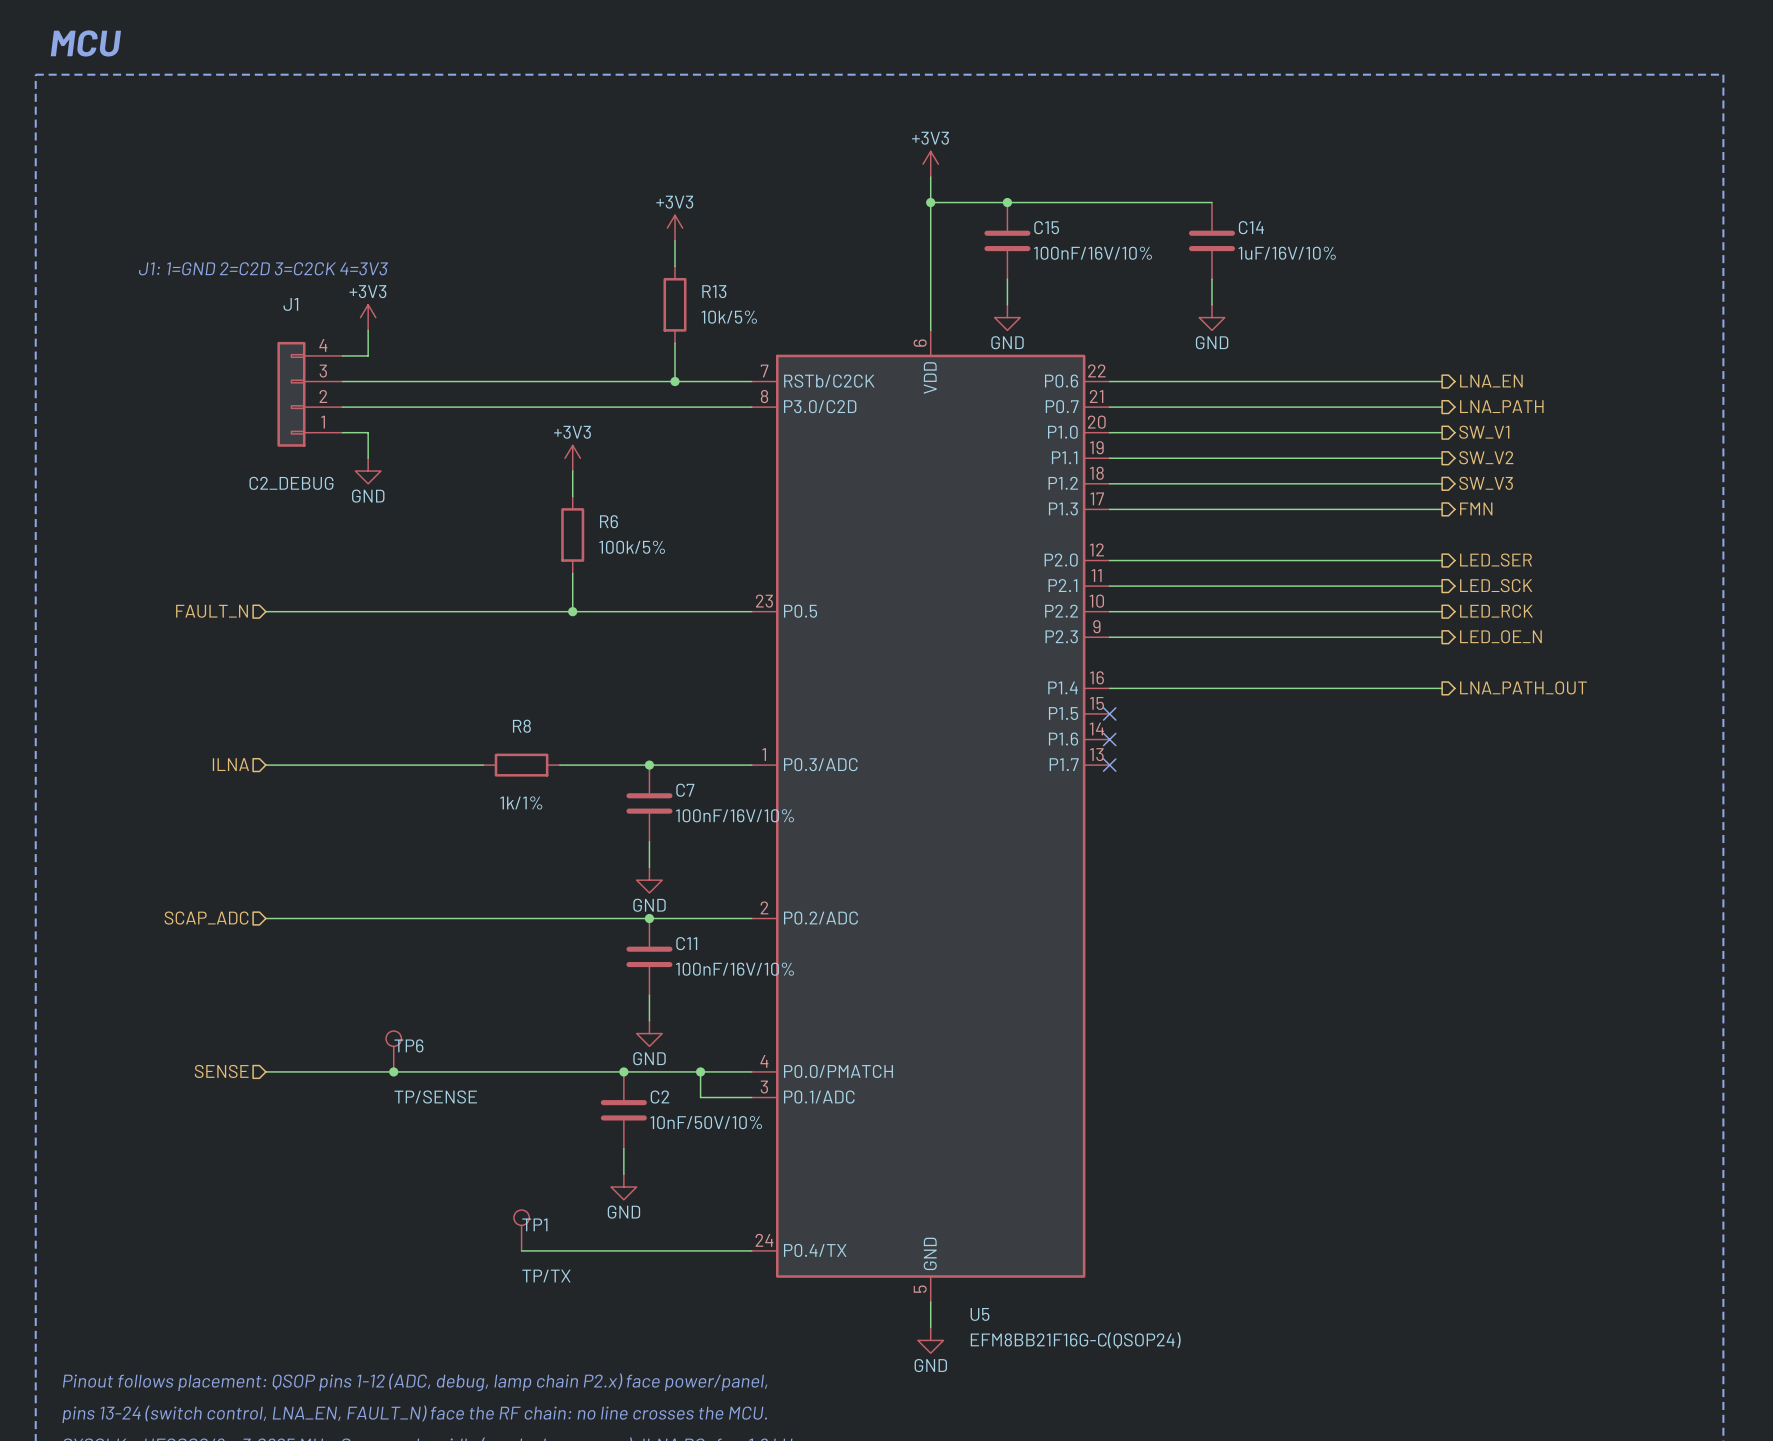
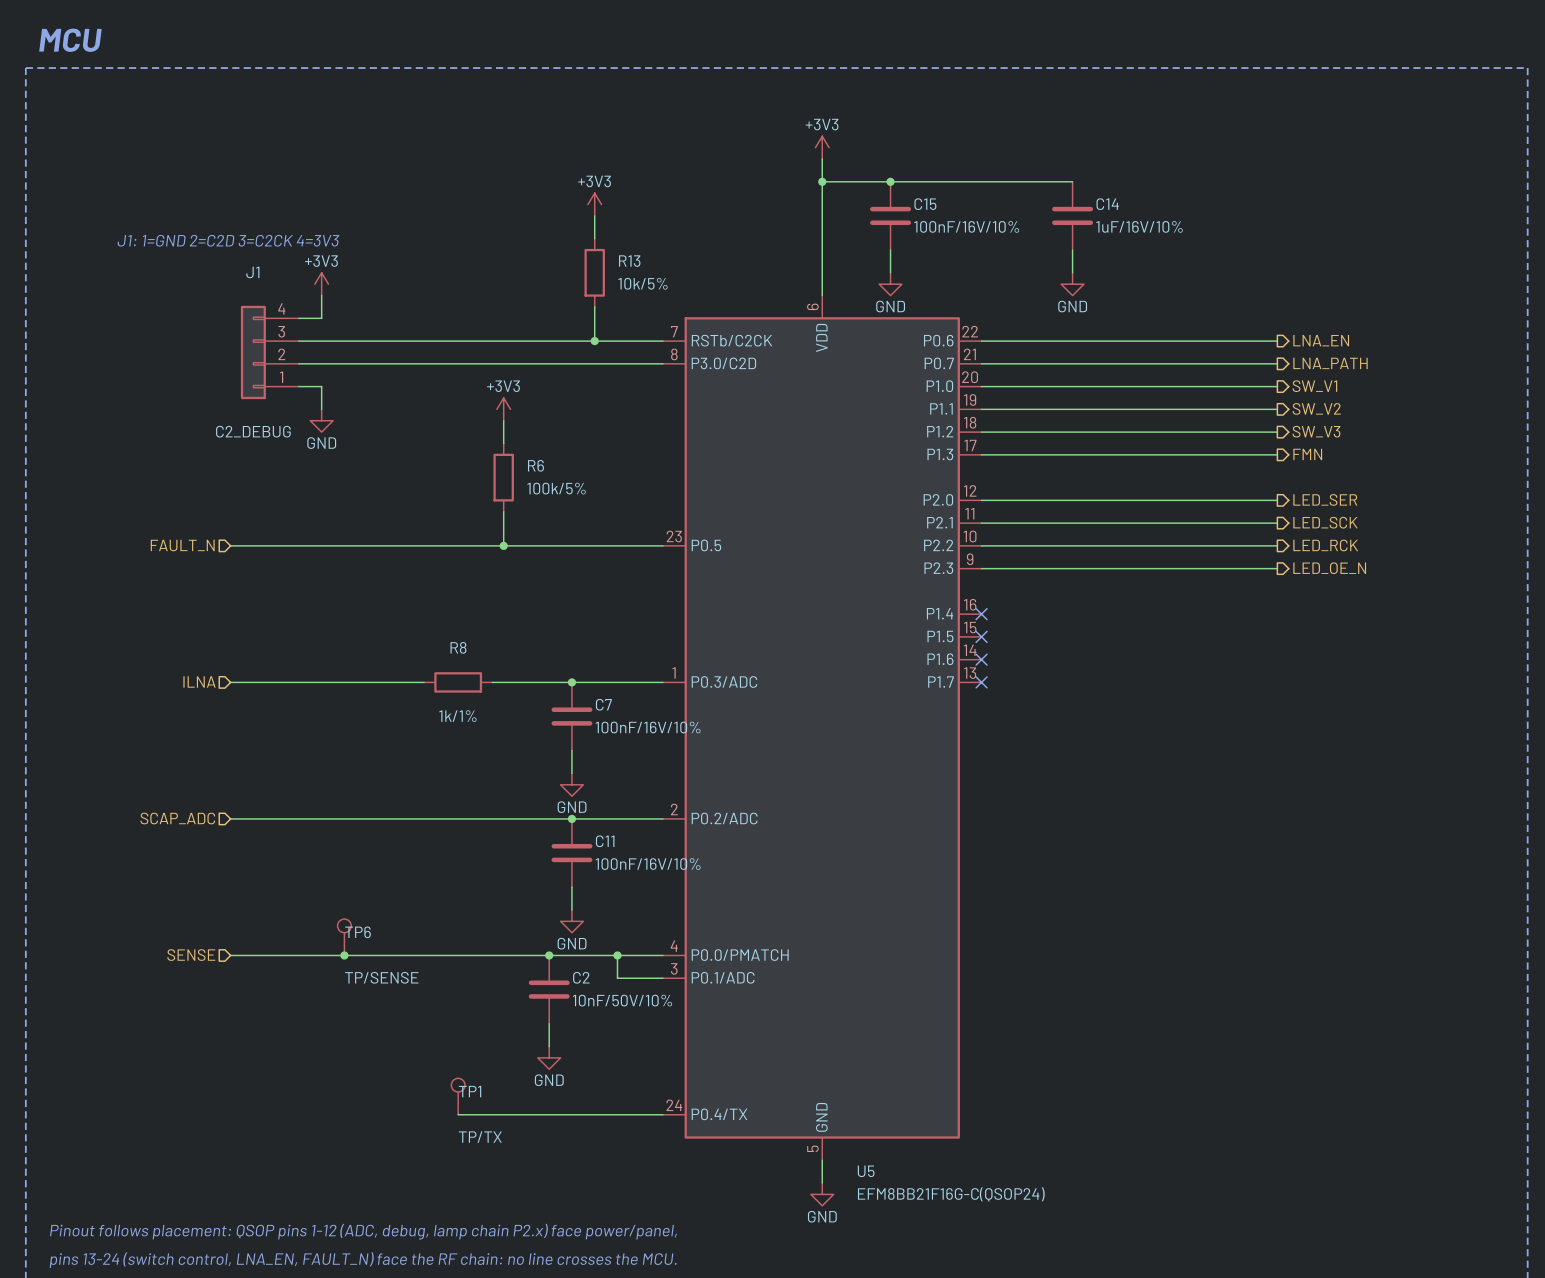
hierarchical label: LNA_PATH_OUT (1523, 687) -> none
wire: (1109, 688) (1442, 688) -> none
no-connect mark: none -> (981, 614)

